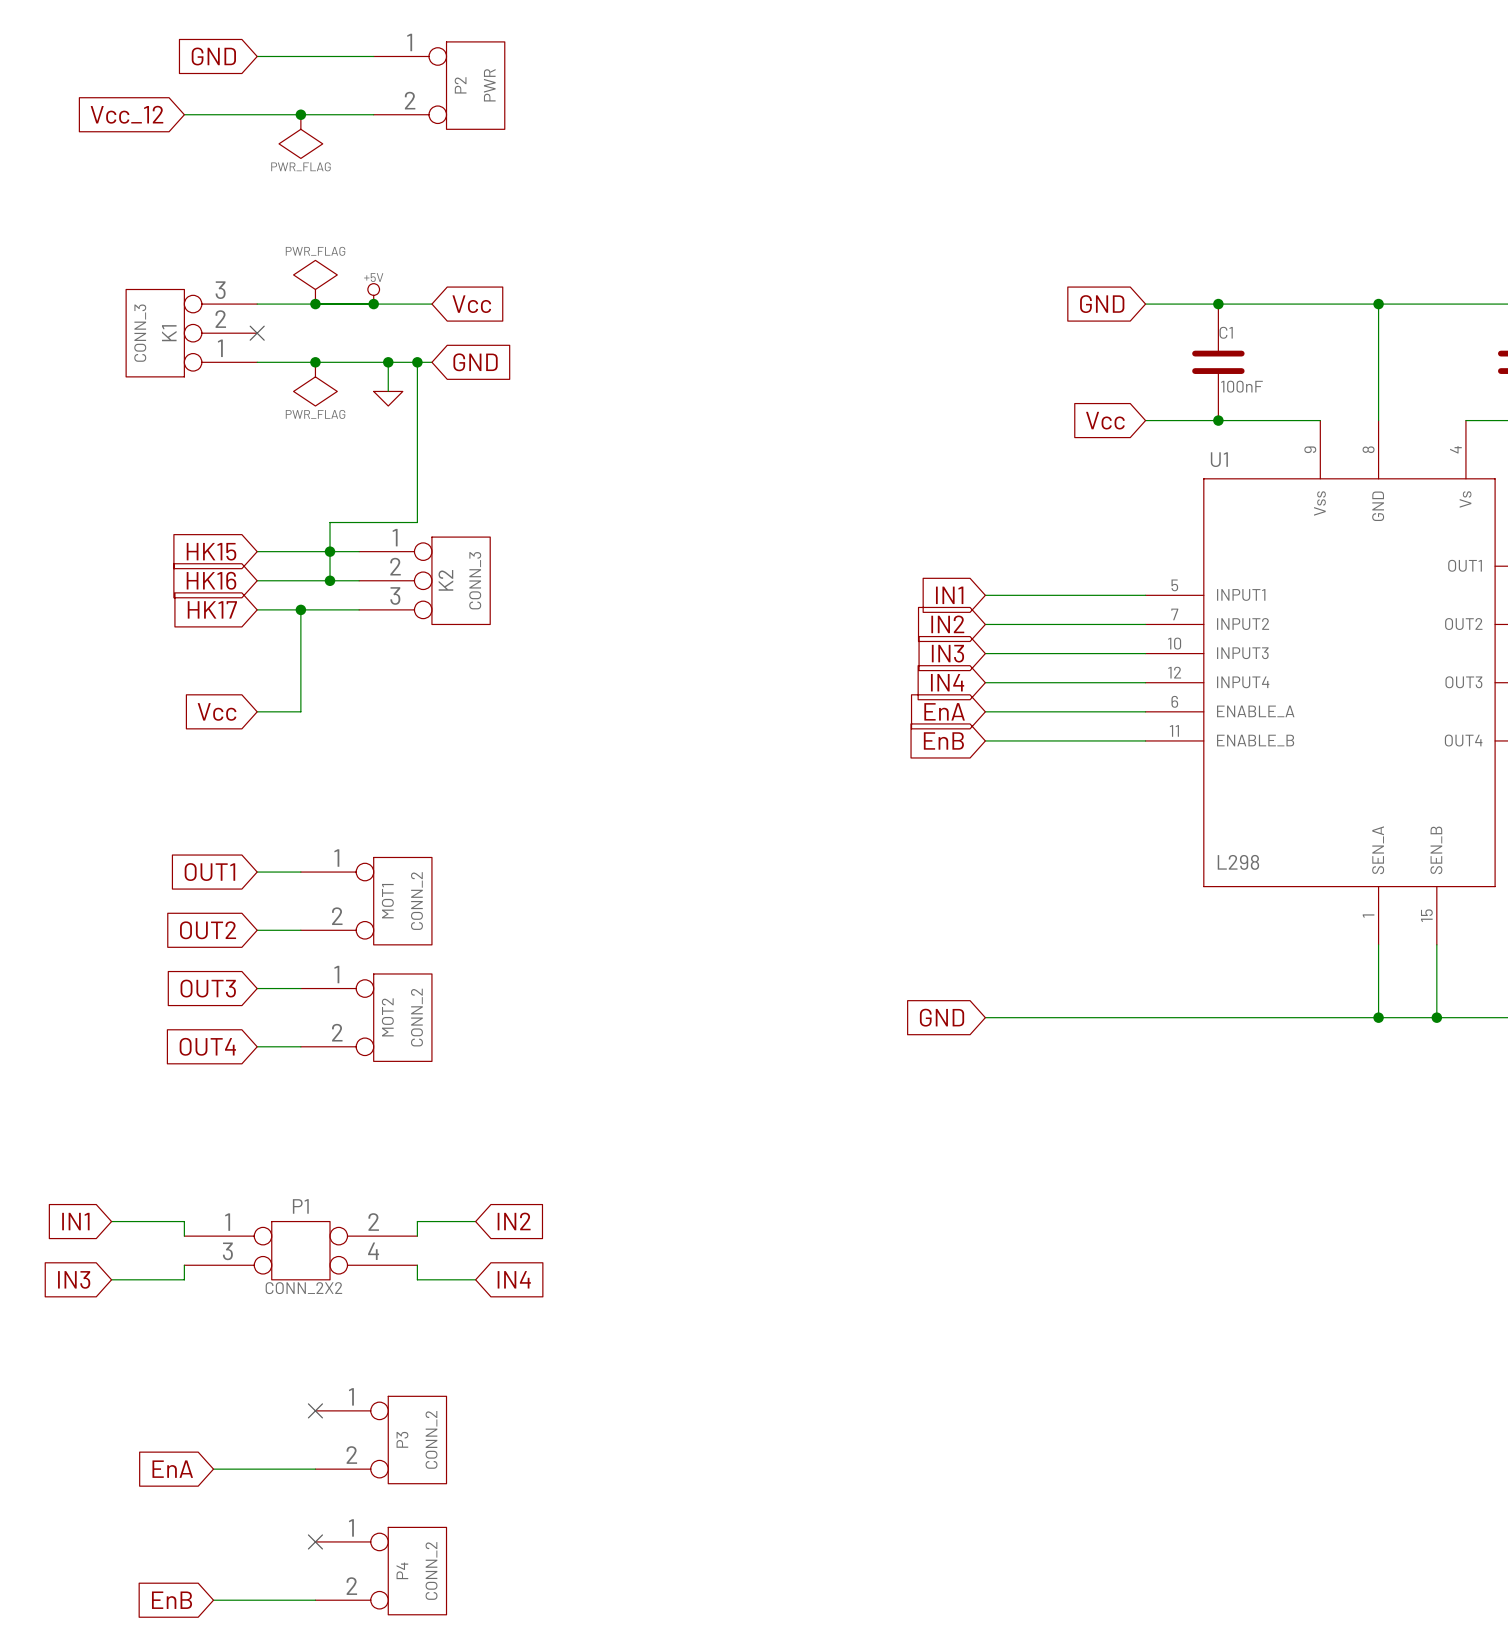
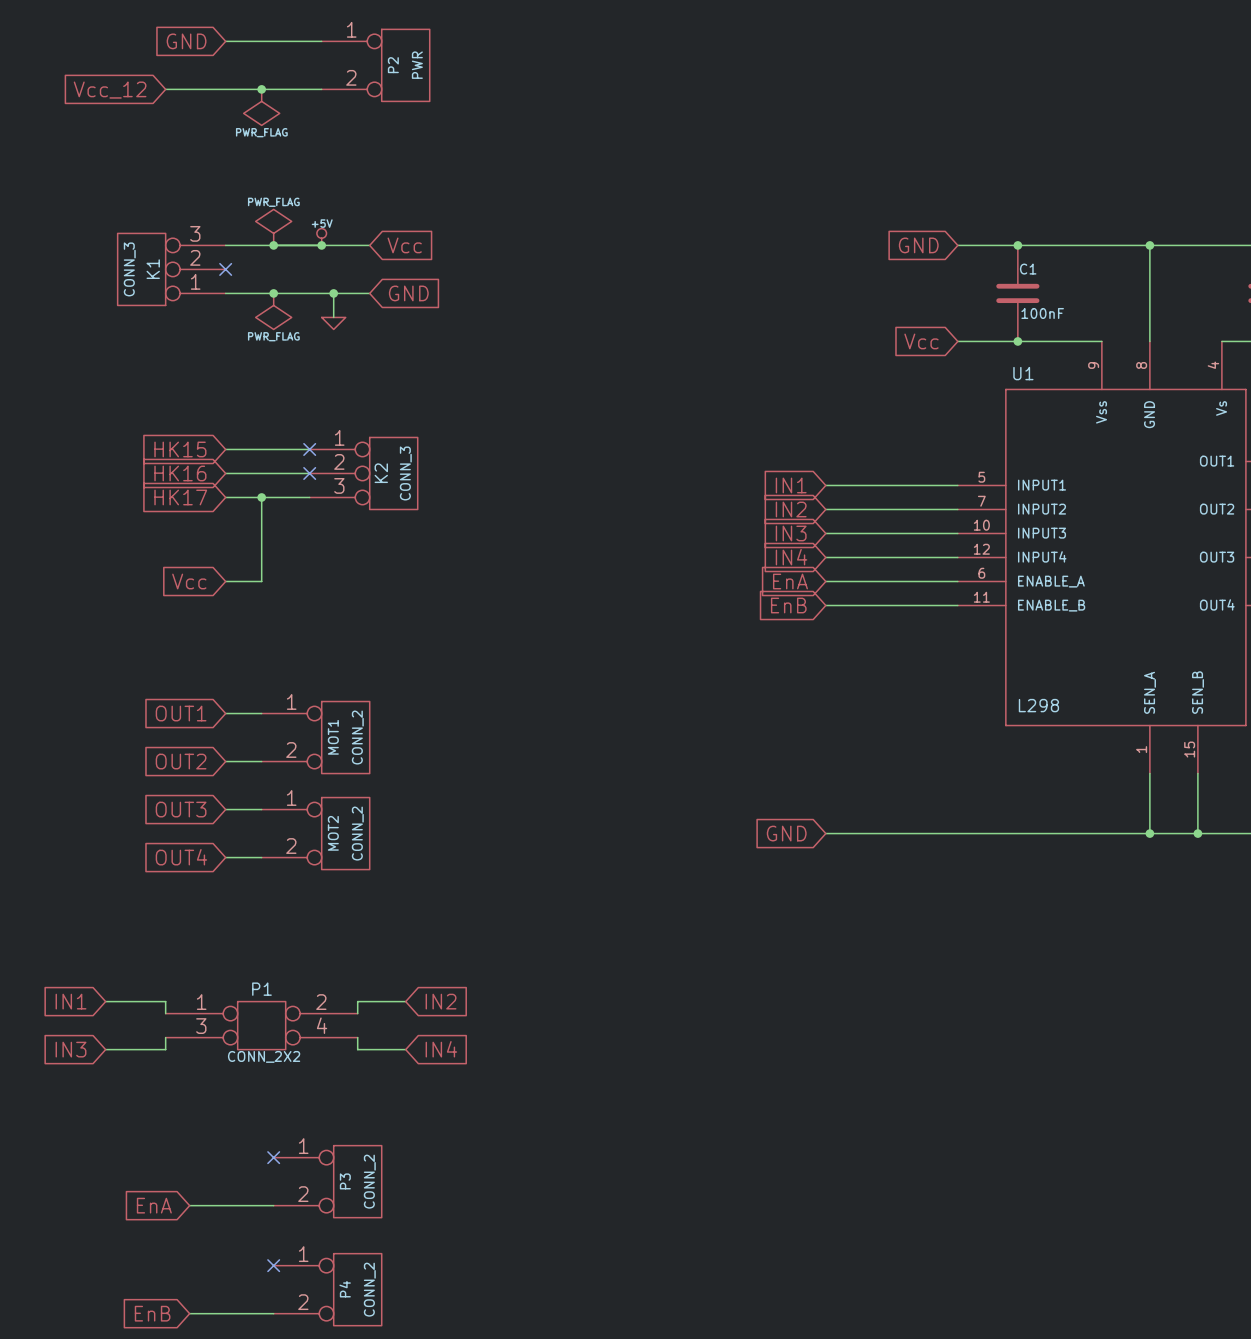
wire: (417, 362) (417, 522) (330, 522) (330, 580) -> none
junction: (417, 362) -> none
junction: (330, 551) -> none
no-connect mark: none -> (309, 449)
junction: (330, 580) -> none
no-connect mark: none -> (309, 473)

